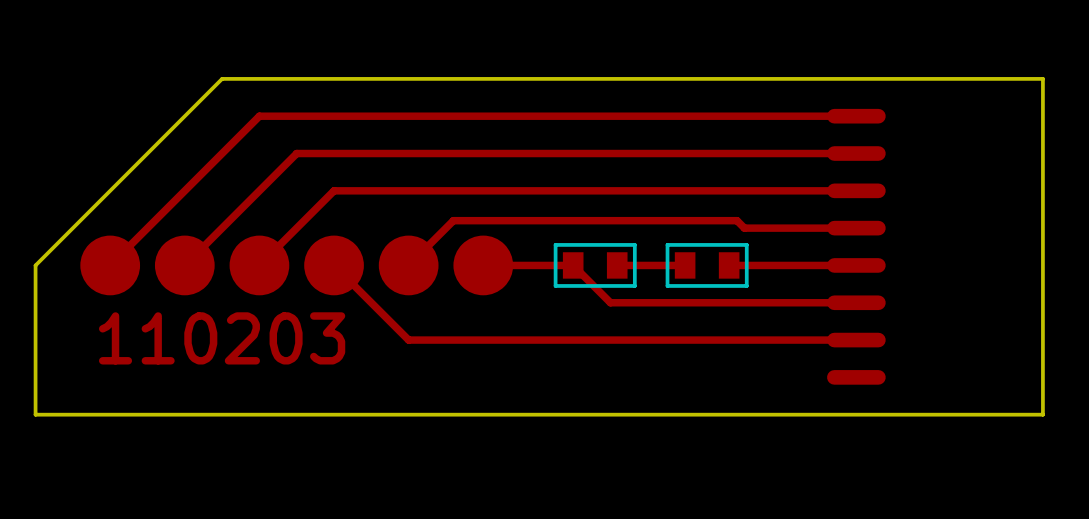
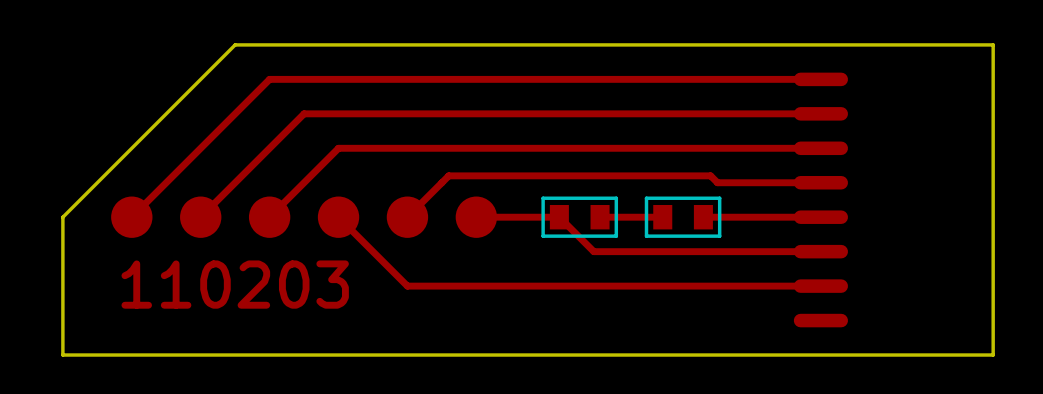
part footprint: [80, 235, 141, 296] -> [111, 196, 153, 238]
part footprint: [154, 235, 215, 296] -> [180, 196, 222, 238]
part footprint: [229, 235, 290, 296] -> [248, 196, 291, 238]
part footprint: [304, 235, 364, 296] -> [317, 196, 360, 238]
part footprint: [378, 235, 439, 296] -> [386, 196, 429, 238]
part footprint: [453, 235, 514, 296] -> [455, 196, 498, 238]

